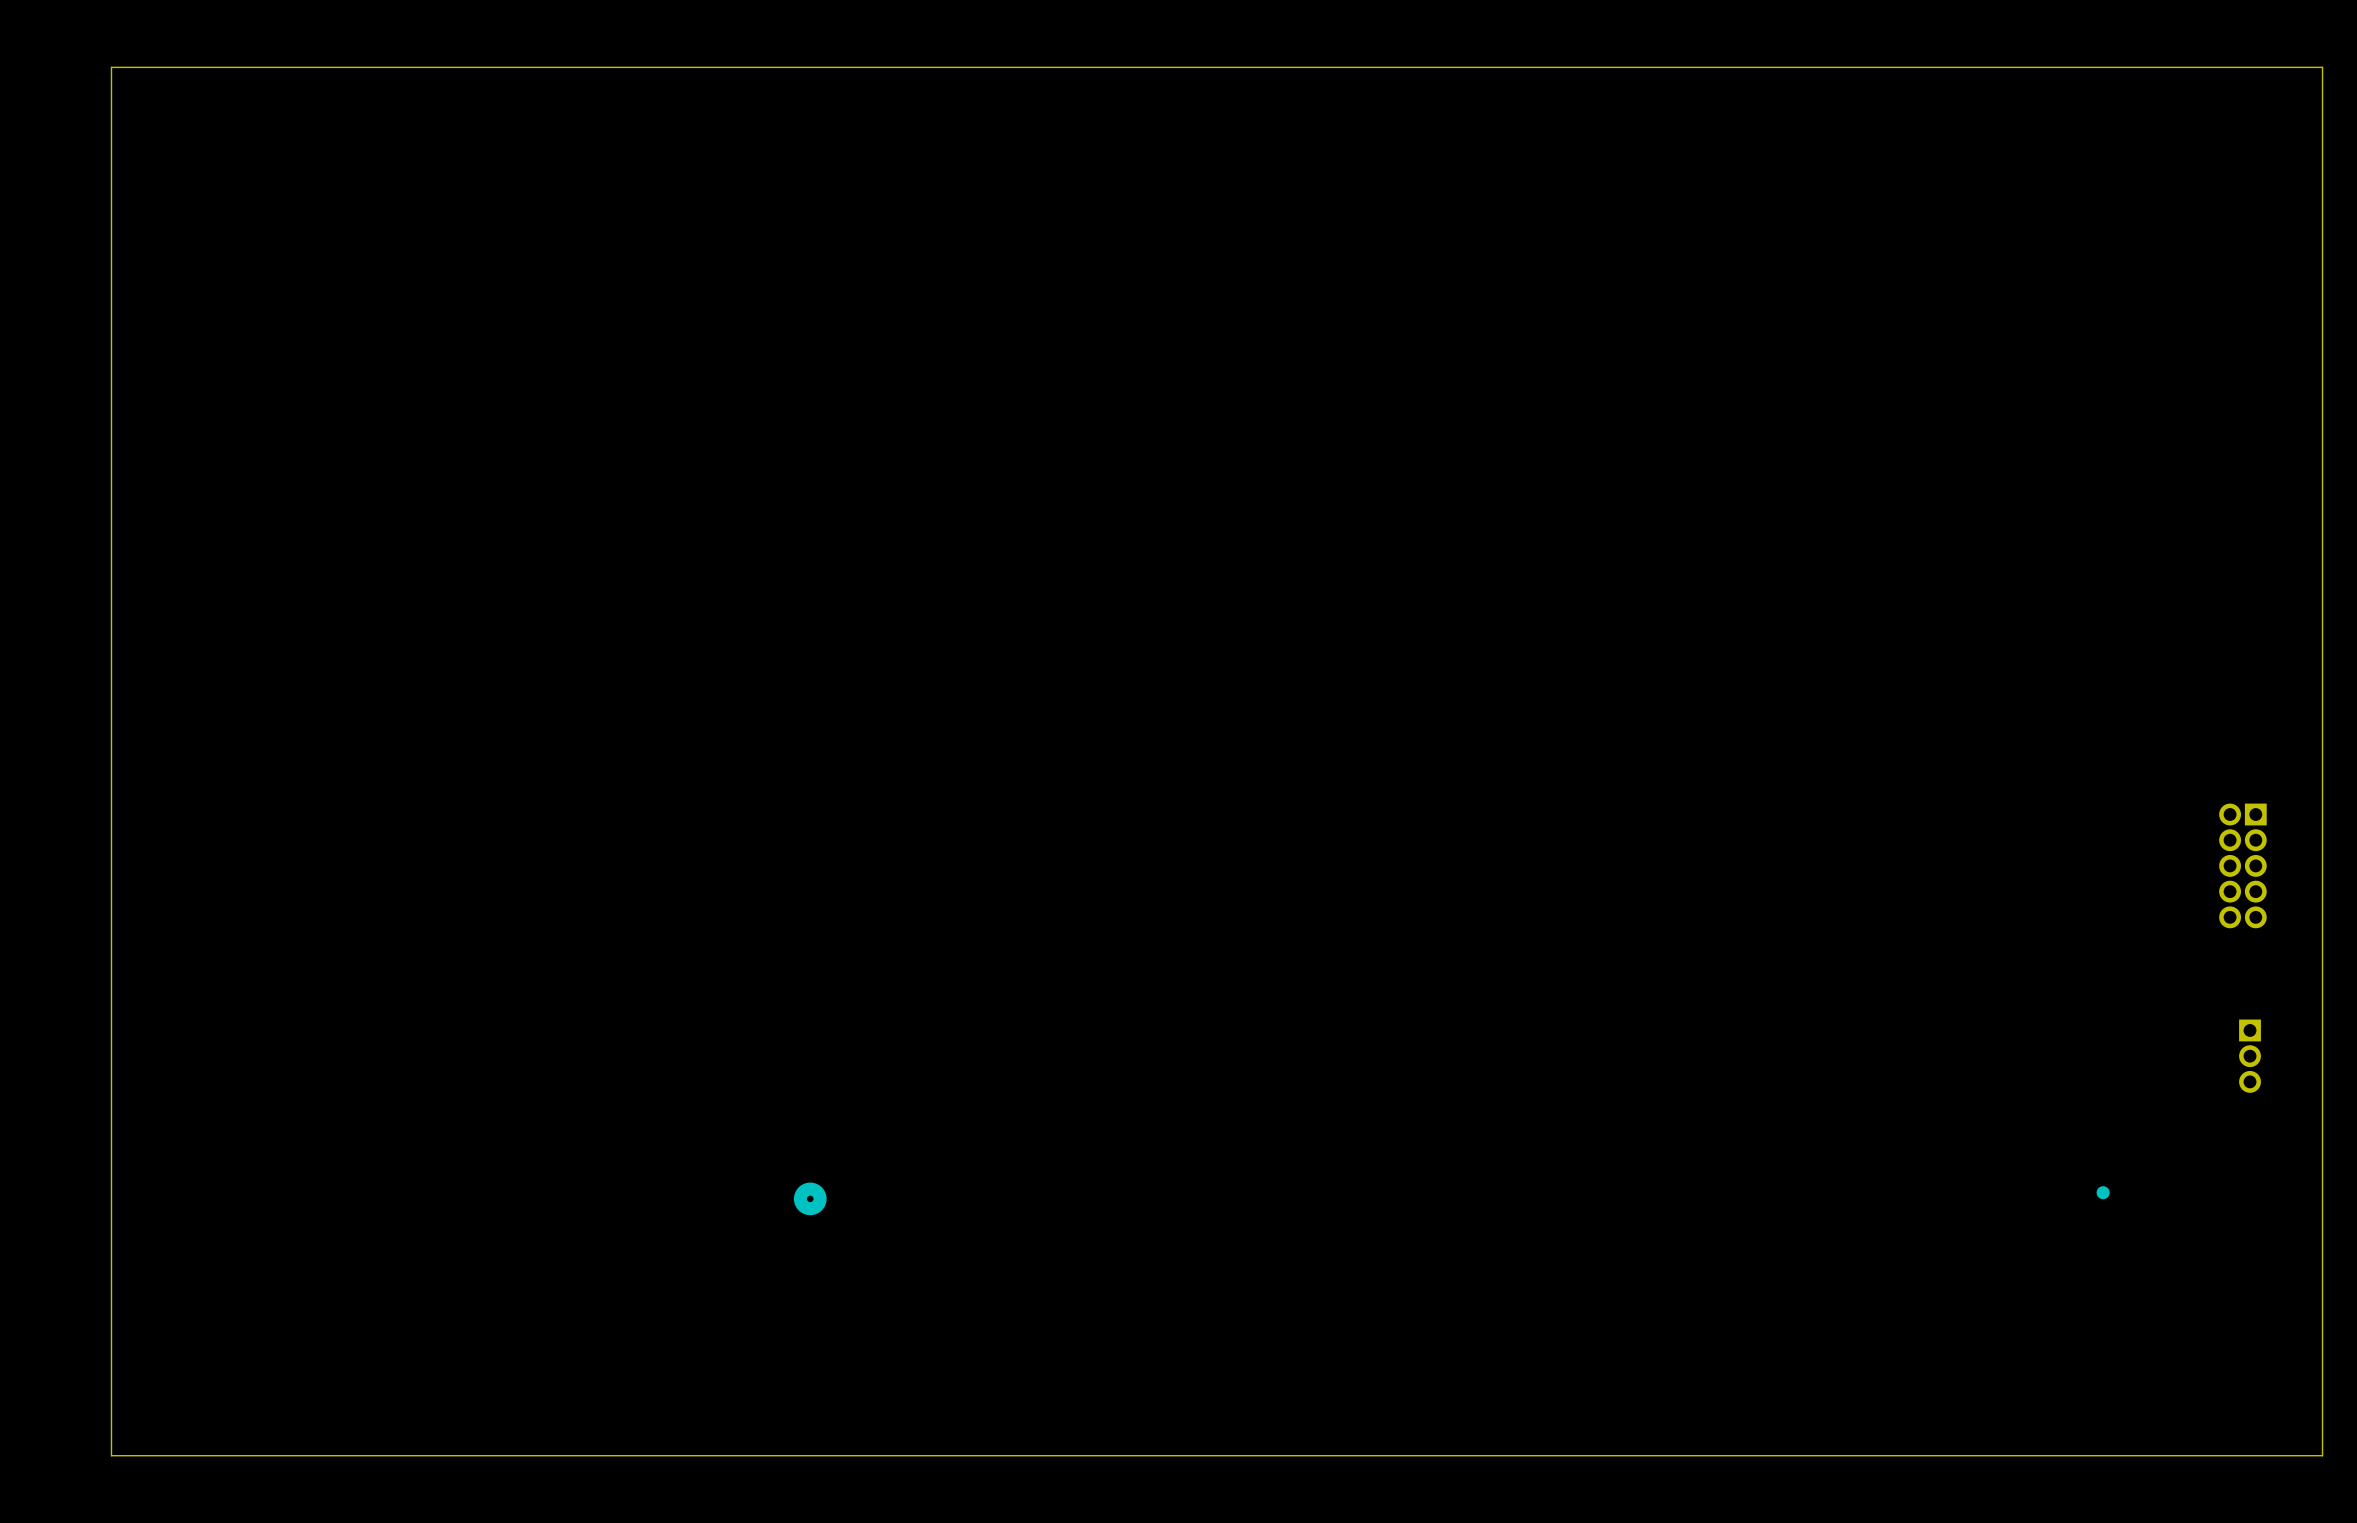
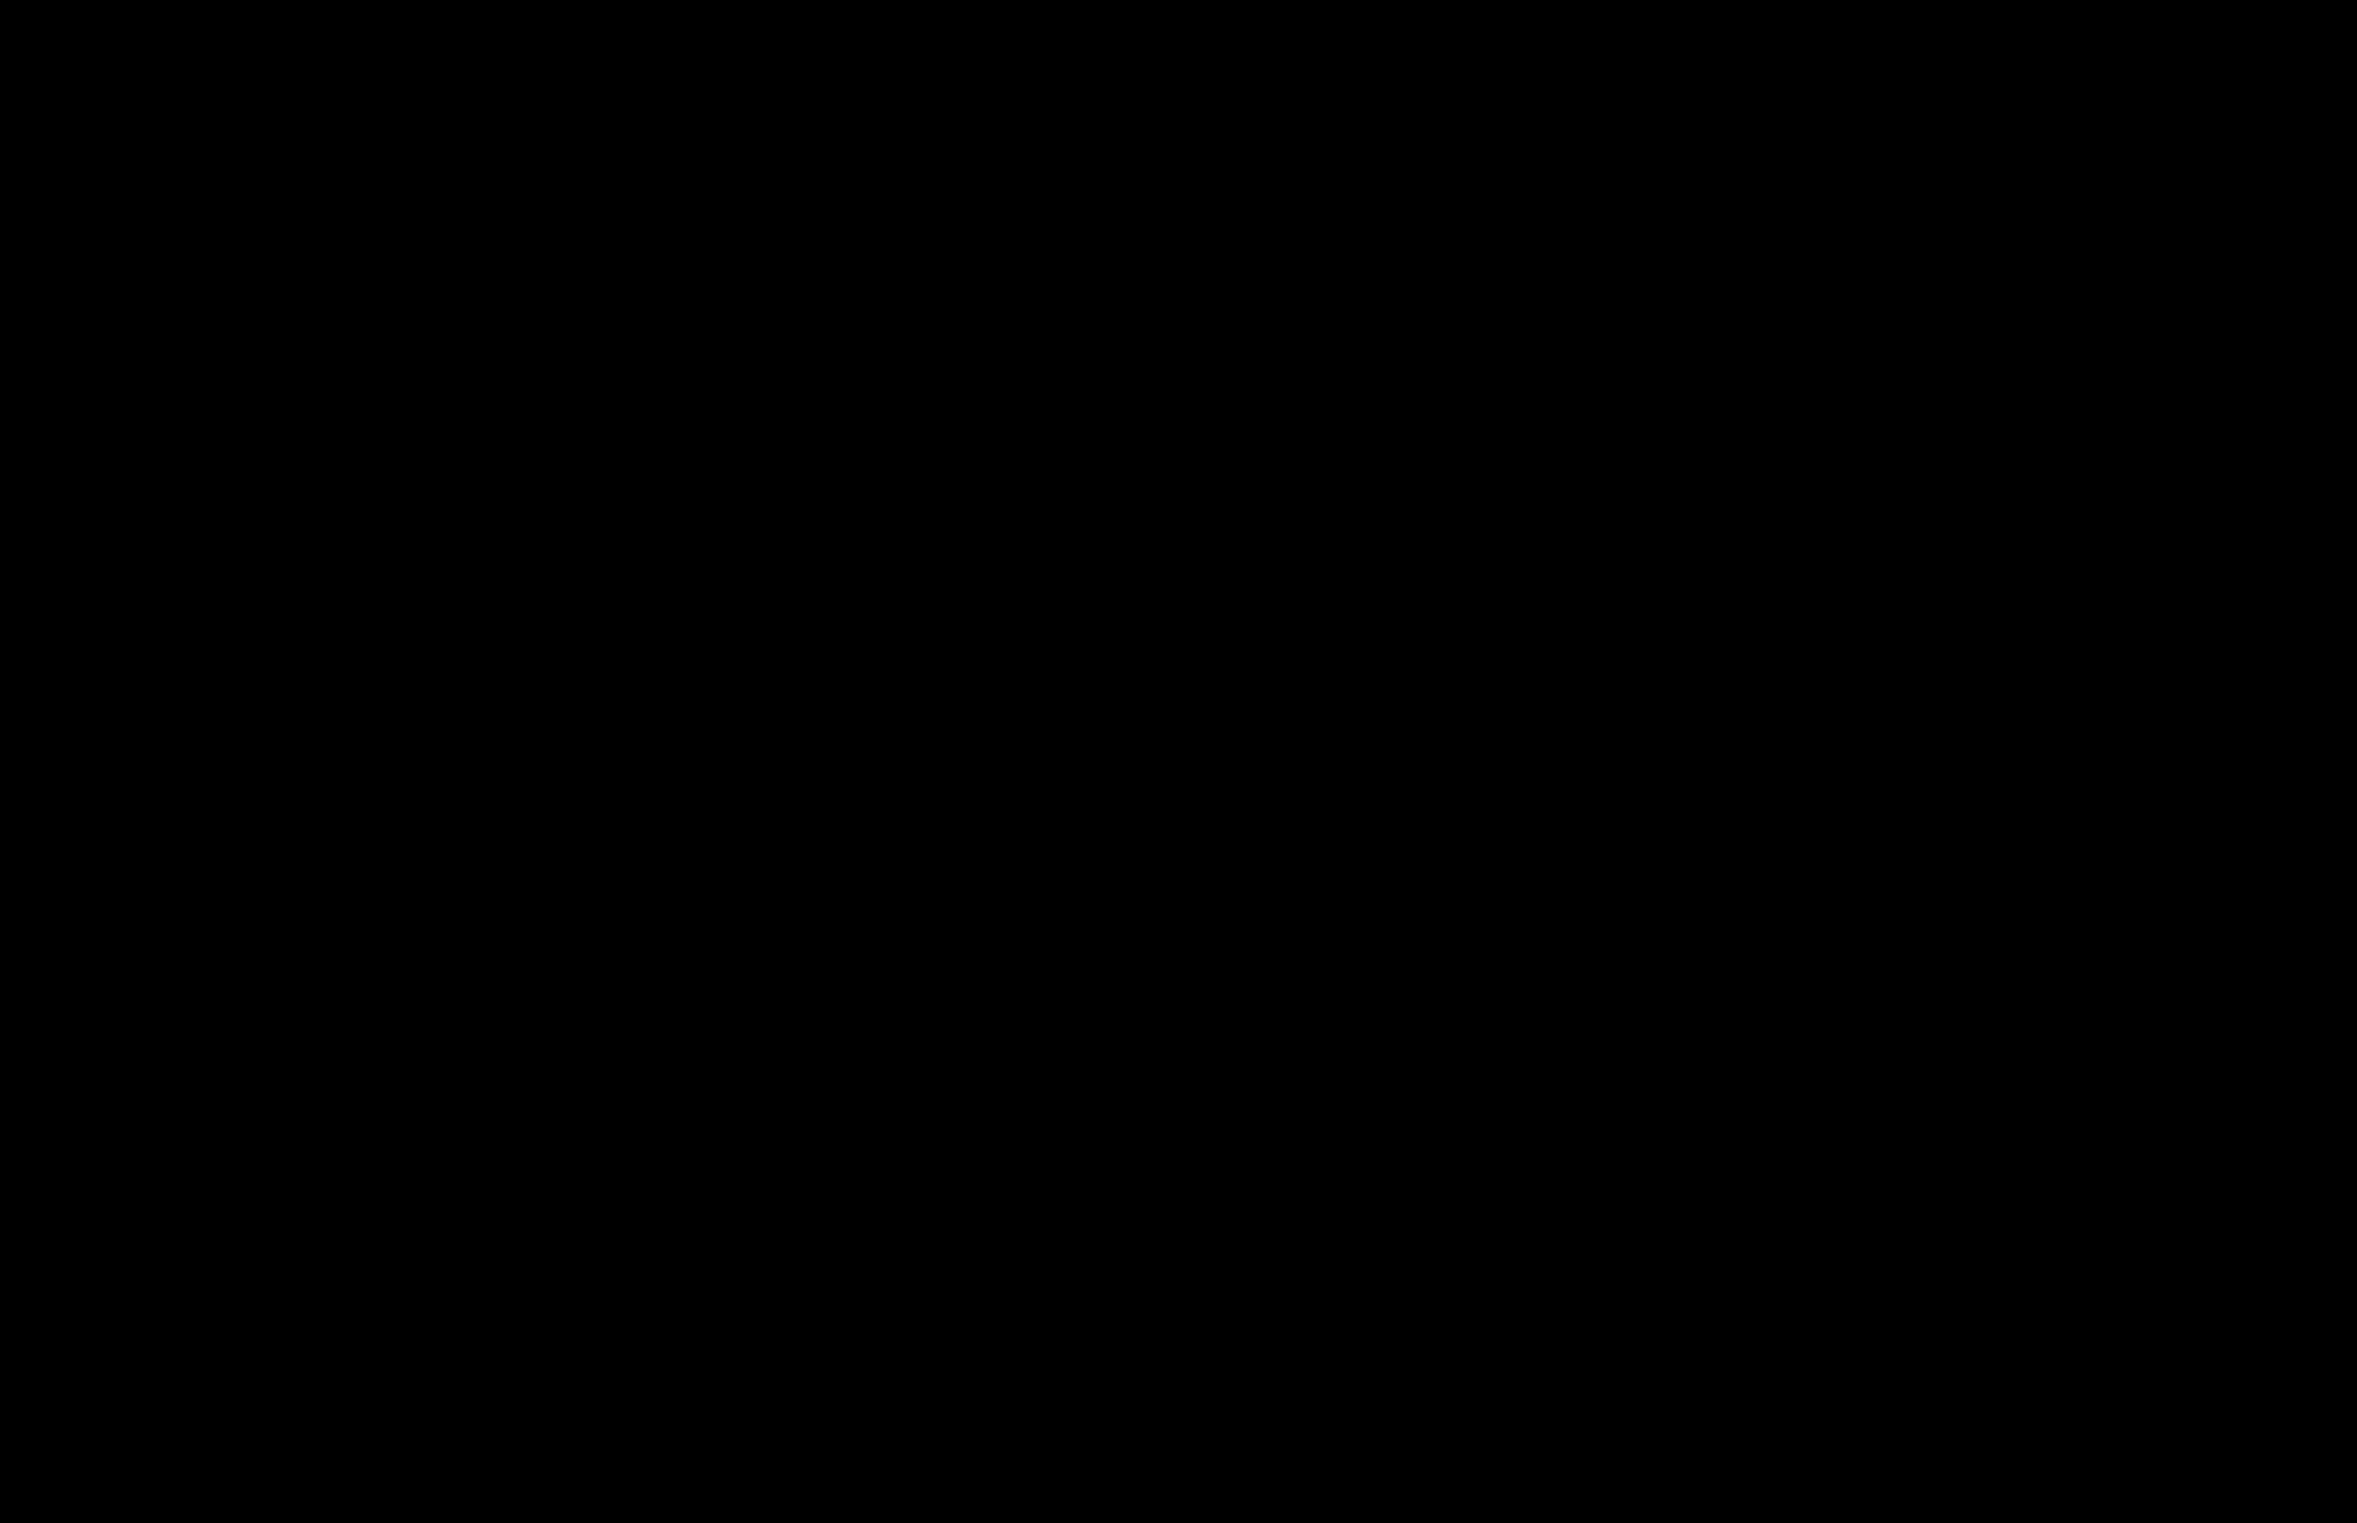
board edge: (2322, 67) (111, 67) (111, 1455) (2322, 1455) (2322, 67) -> none
part: (2242, 865) -> none
part: (2250, 1056) -> none
part: (2103, 1192) -> none
part: (810, 1198) -> none

